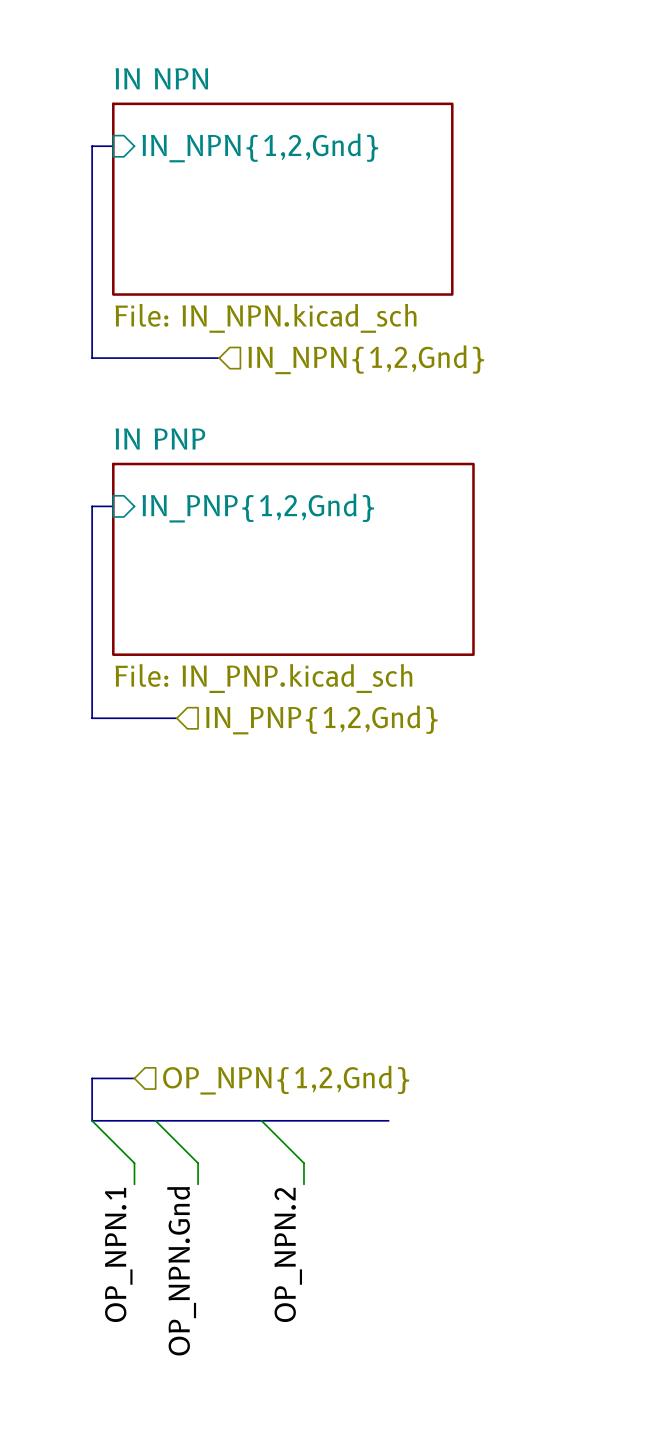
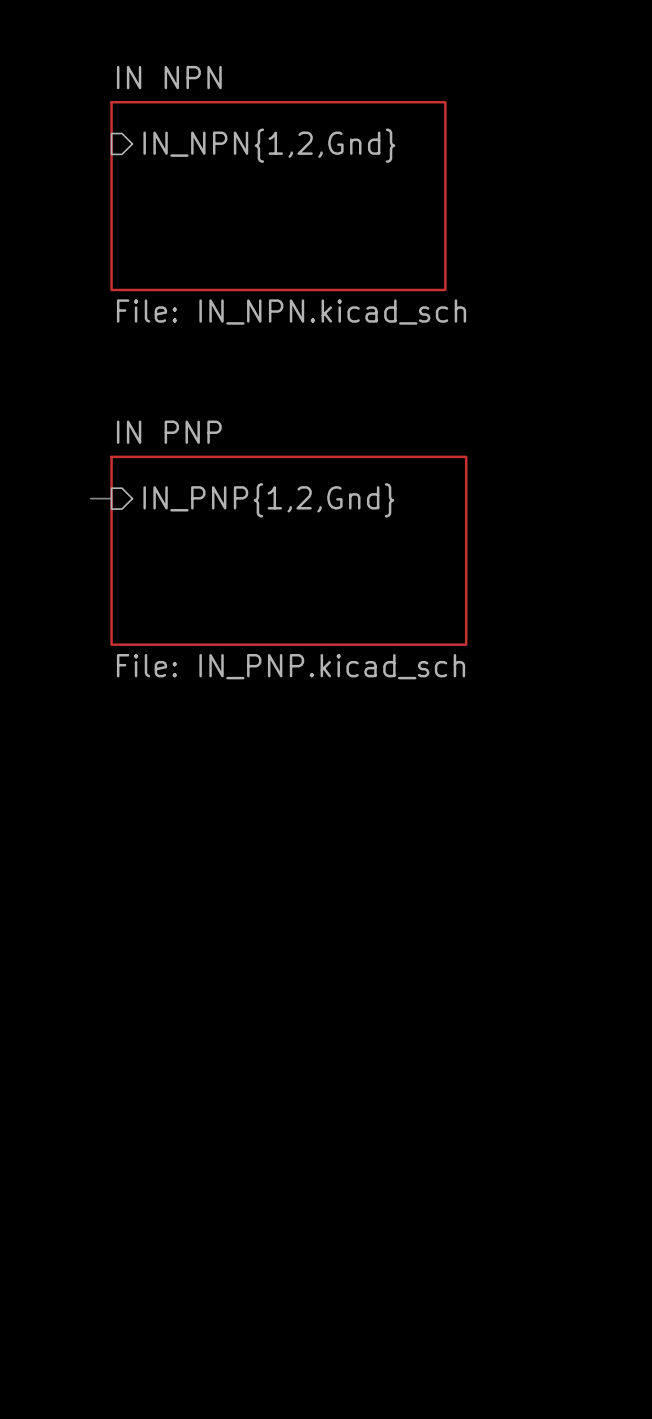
bus: (113, 146) (92, 146) (92, 358) (219, 358) -> none
hierarchical label: IN_NPN{1,2,Gnd} (366, 359) -> none
bus: (92, 506) (92, 718) (176, 718) -> none
hierarchical label: IN_PNP{1,2,Gnd} (321, 719) -> none
bus: (134, 1078) (92, 1078) (92, 1120) (388, 1120) -> none
hierarchical label: OP_NPN{1,2,Gnd} (286, 1080) -> none
wire: (92, 1120) (134, 1163) (134, 1184) -> none
wire: (155, 1120) (198, 1163) (198, 1184) -> none
wire: (261, 1120) (303, 1163) (303, 1184) -> none
label: OP_NPN.1 (118, 1254) -> none
label: OP_NPN.2 (288, 1254) -> none
label: OP_NPN.Gnd (181, 1271) -> none

